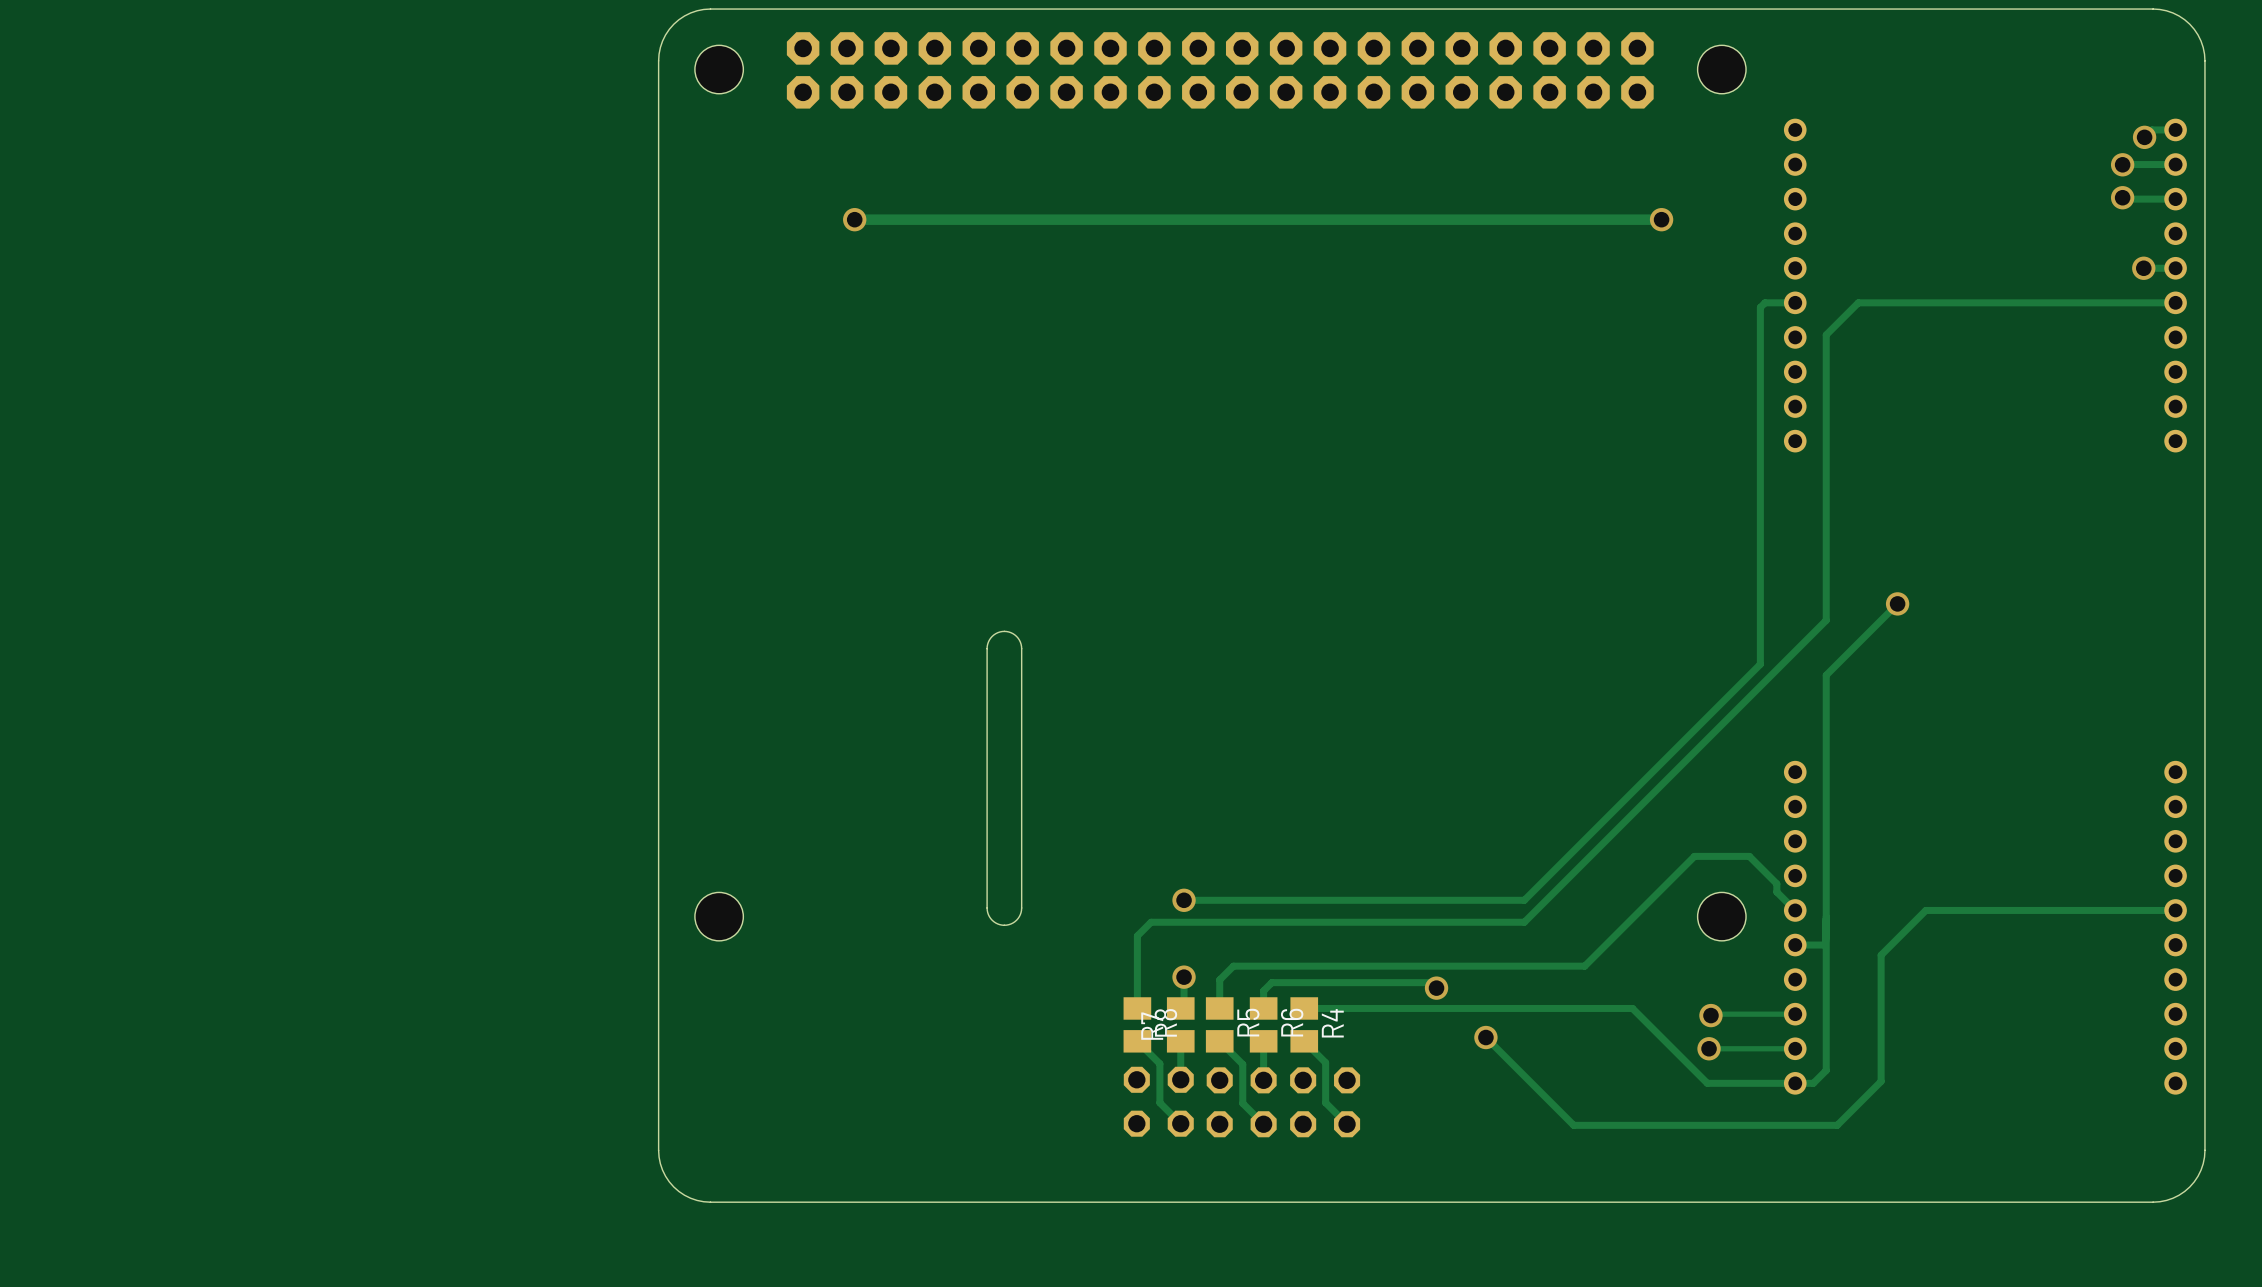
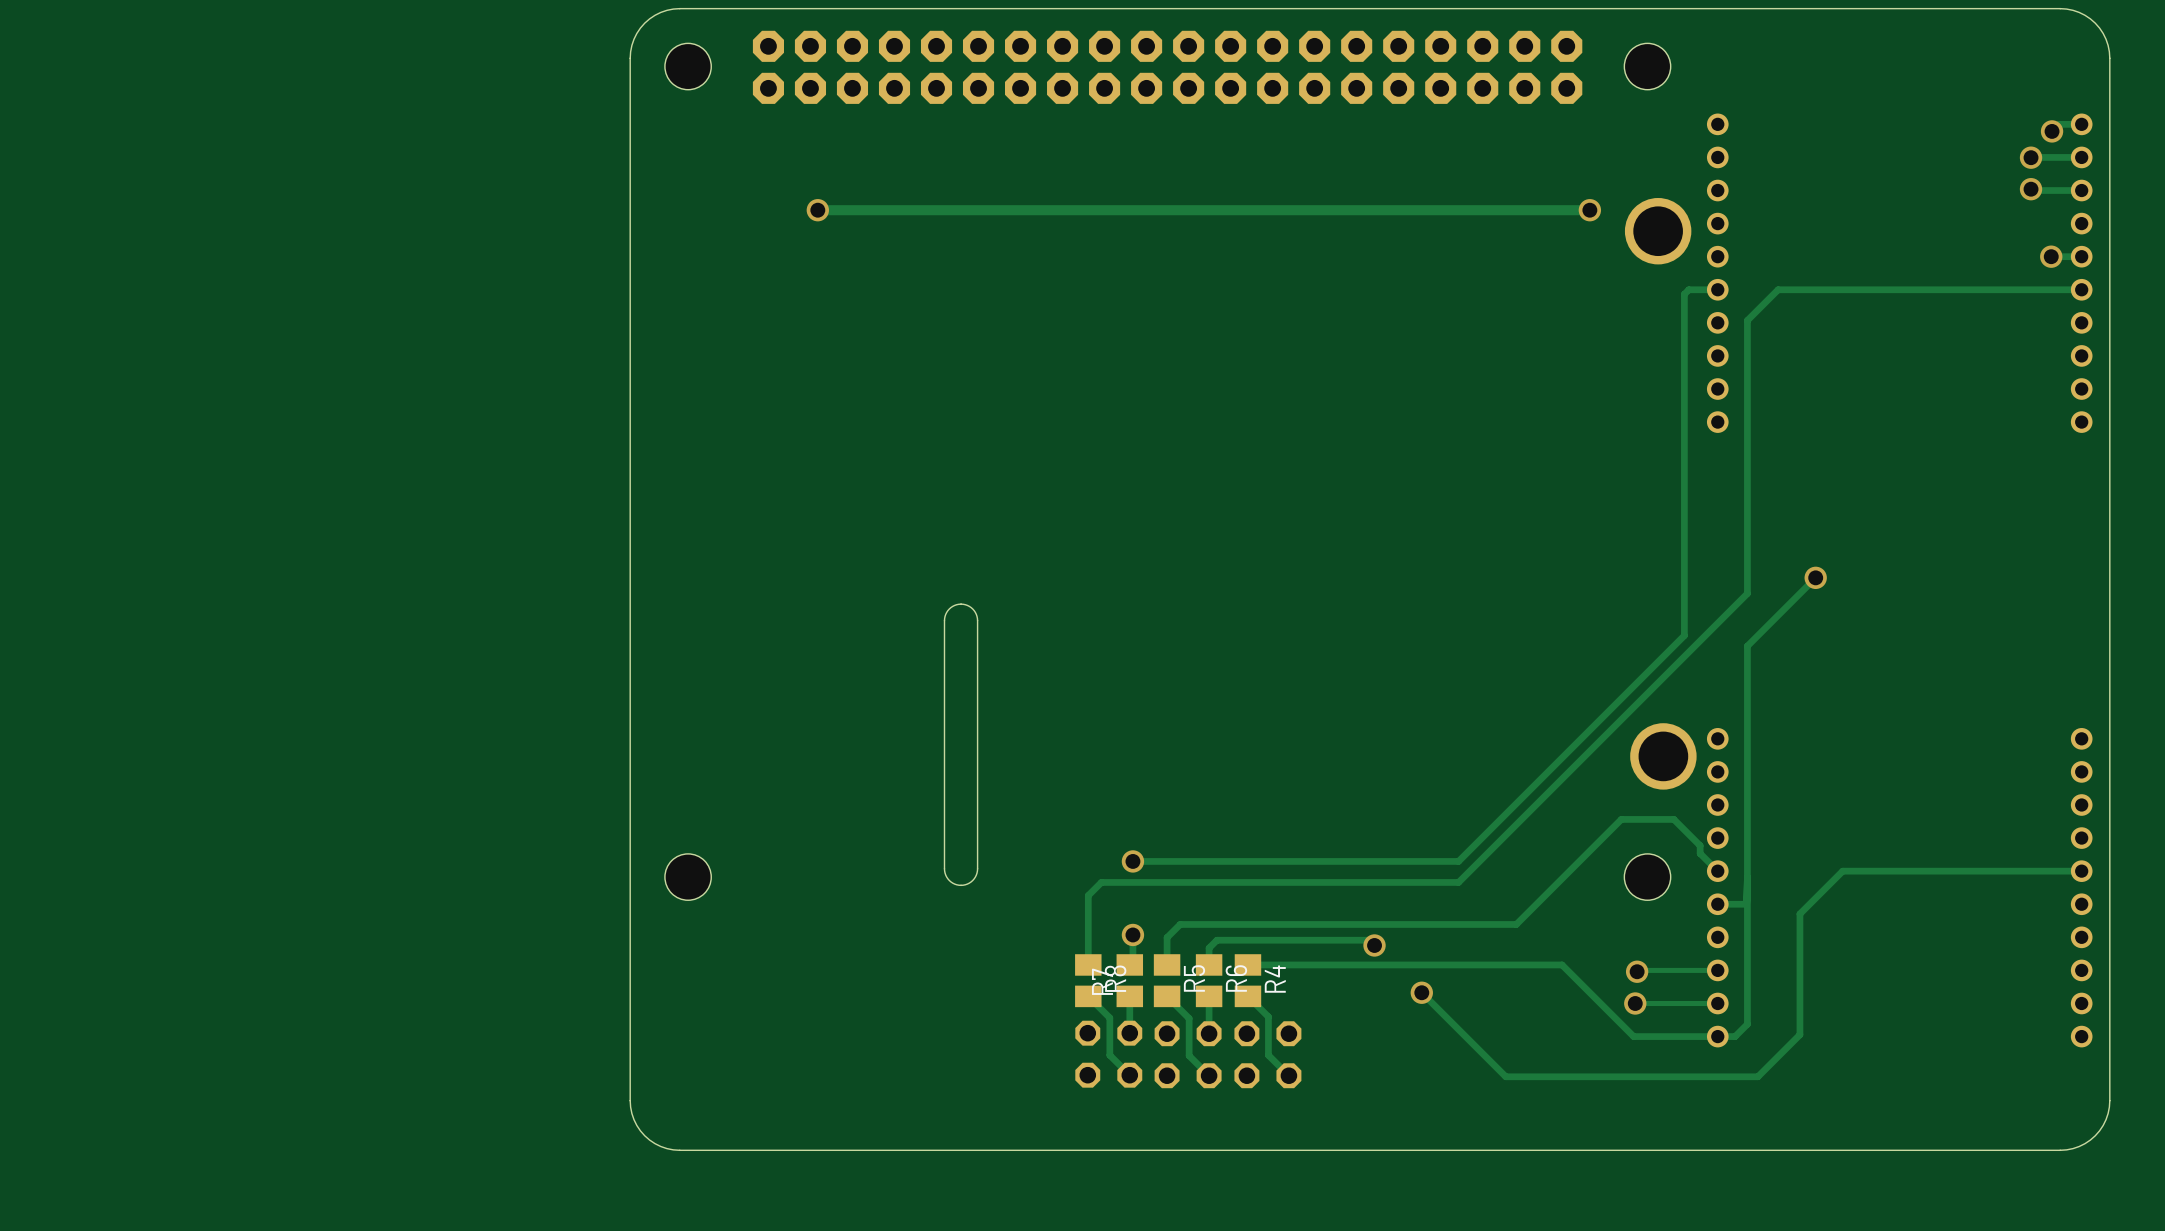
part: none -> (1658, 231)
part: none -> (1663, 756)

